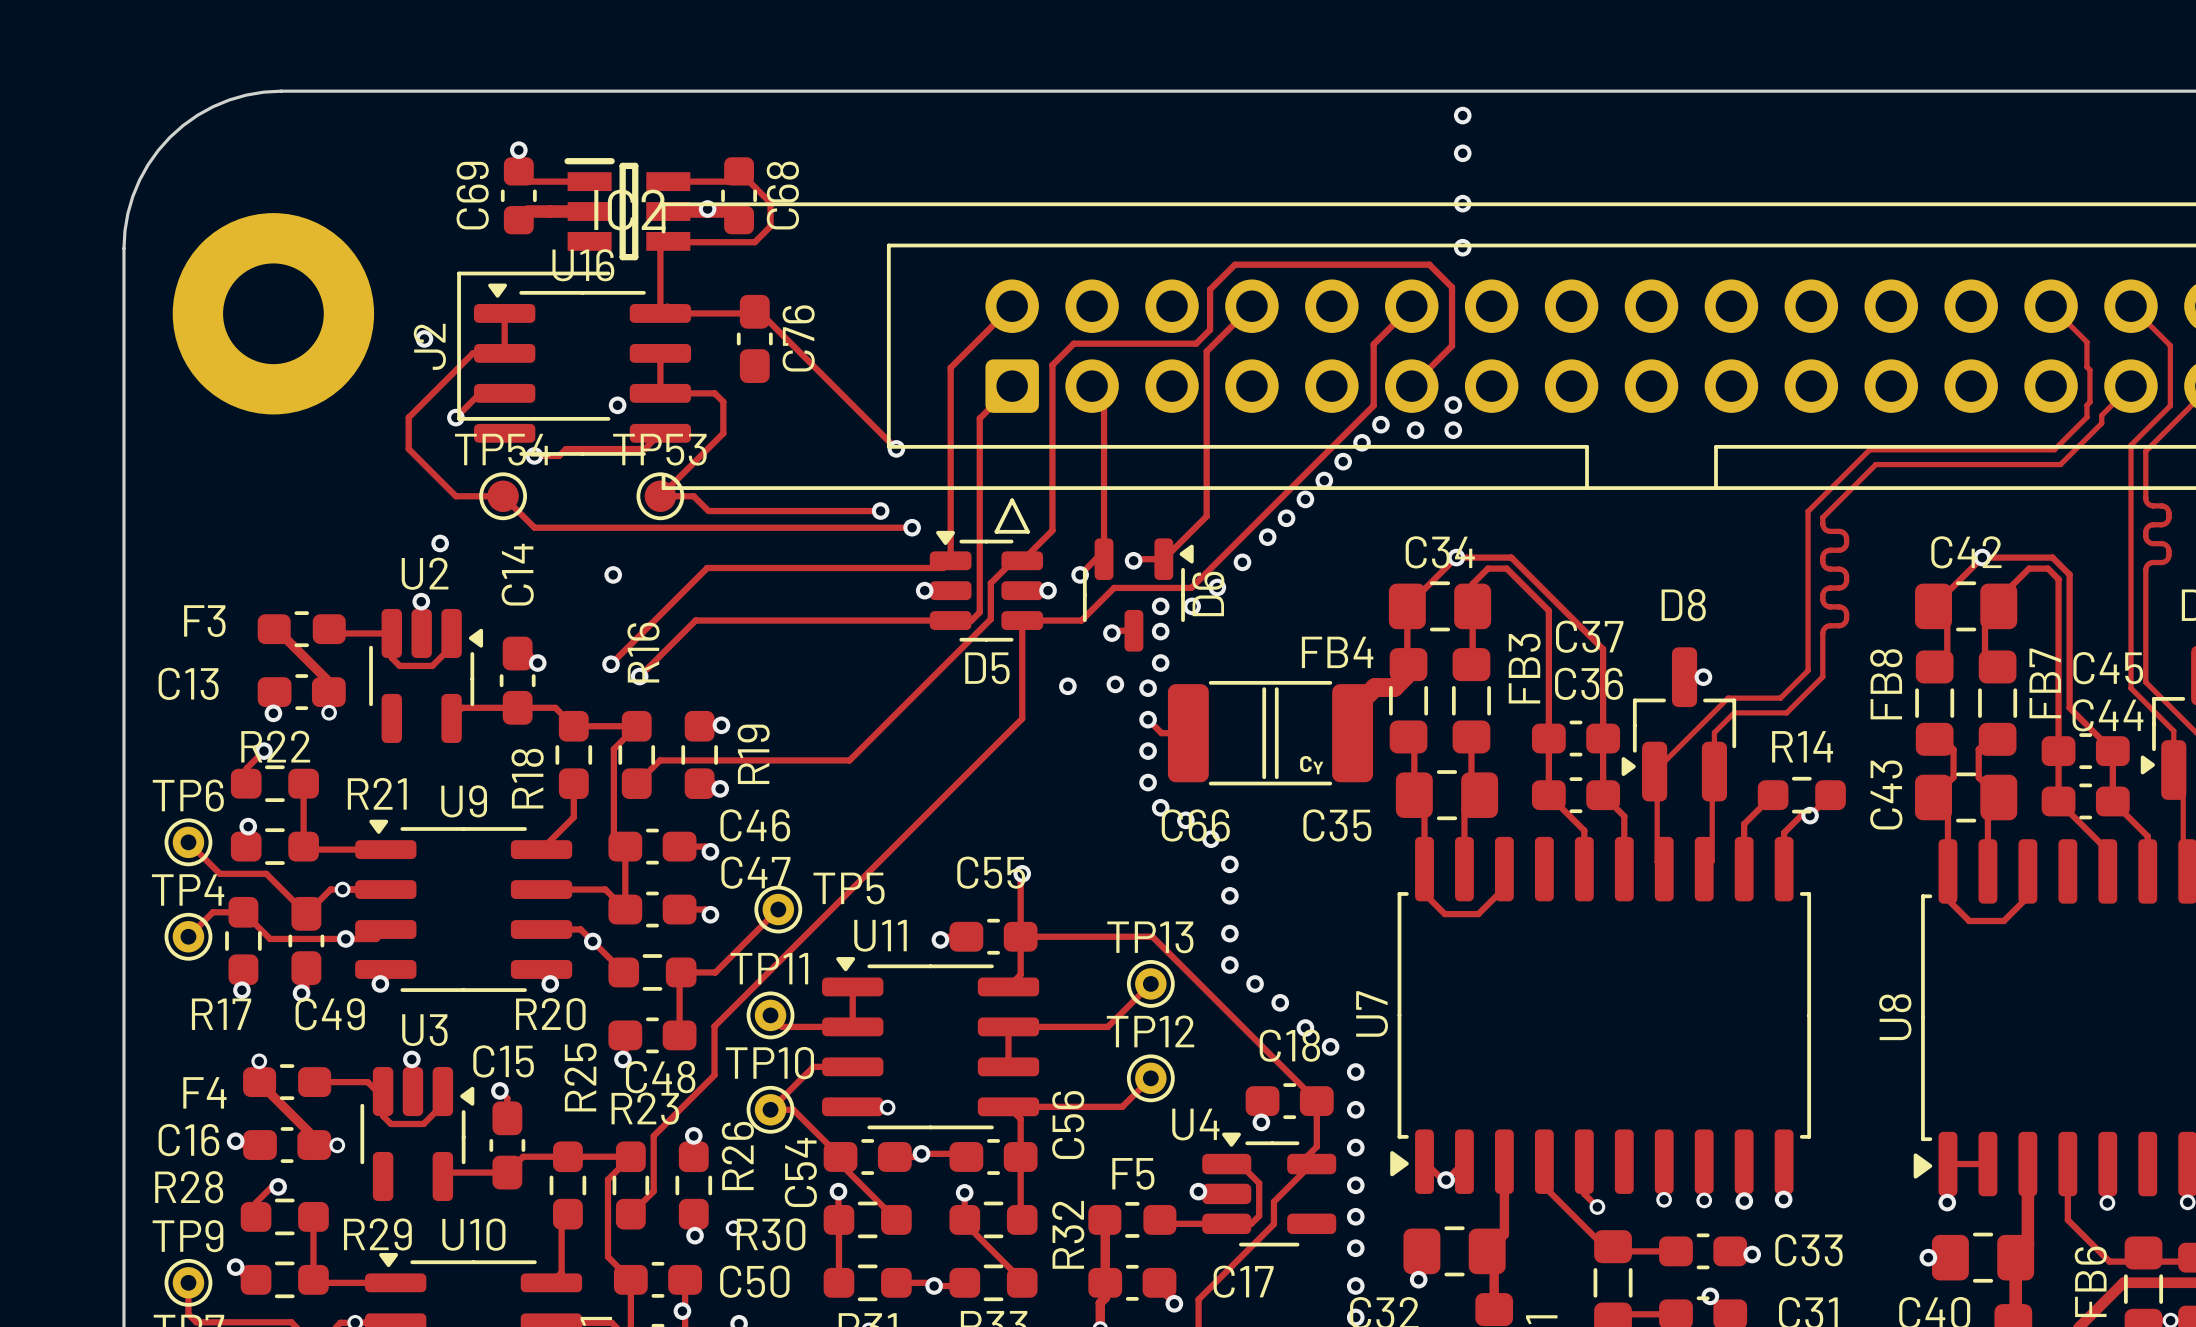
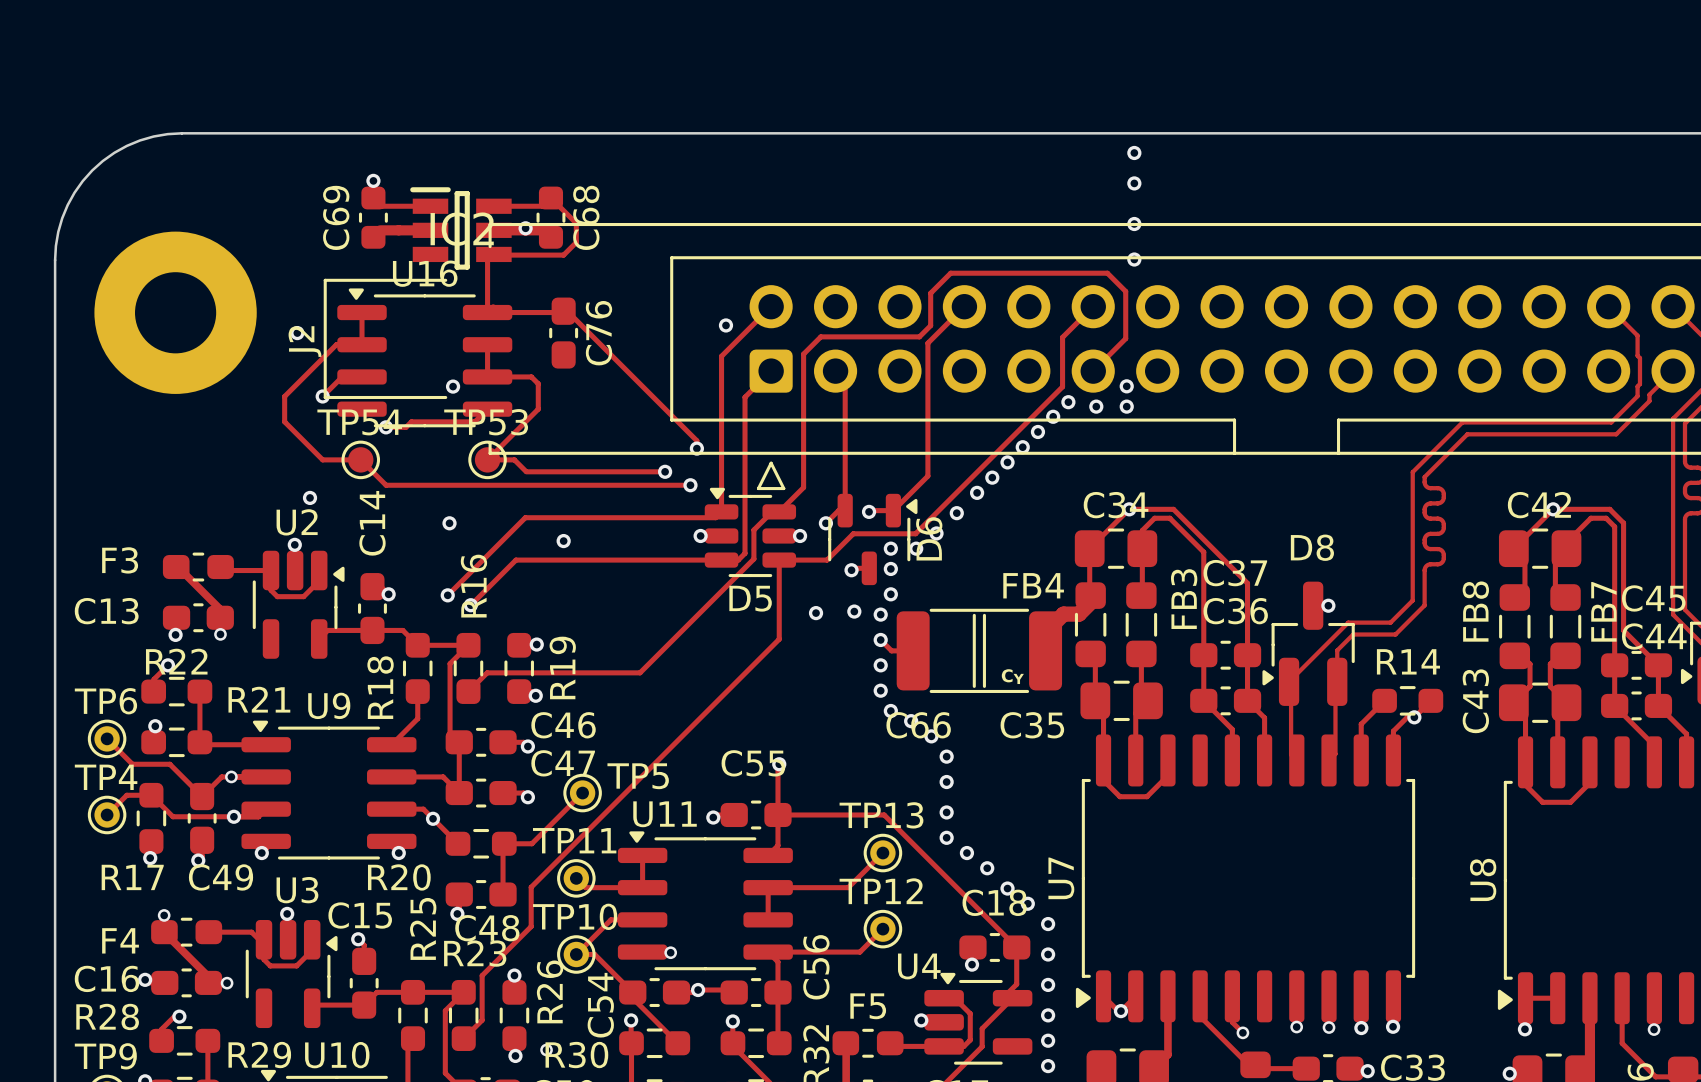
via: none -> (725, 325)
track: none -> (677, 421) (696, 440) (696, 448)
via position: (896, 448) -> (696, 448)
via: none -> (563, 541)

